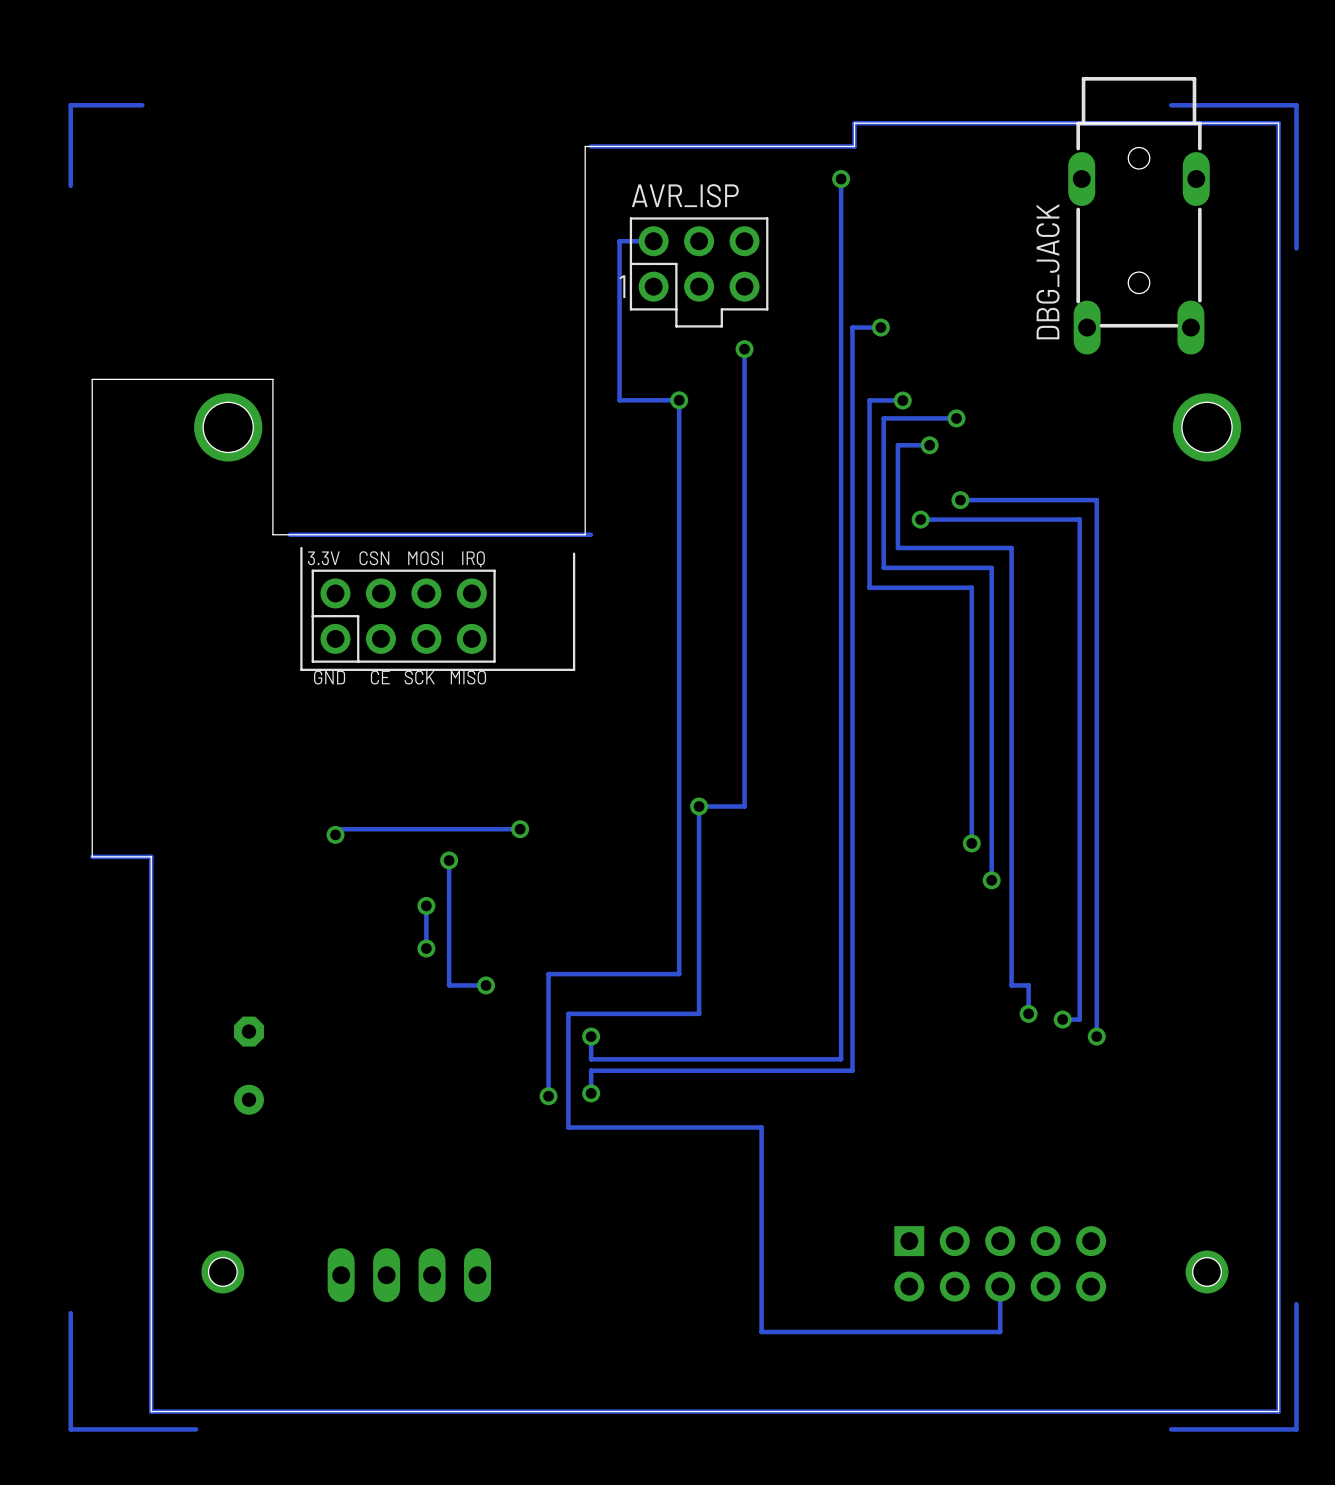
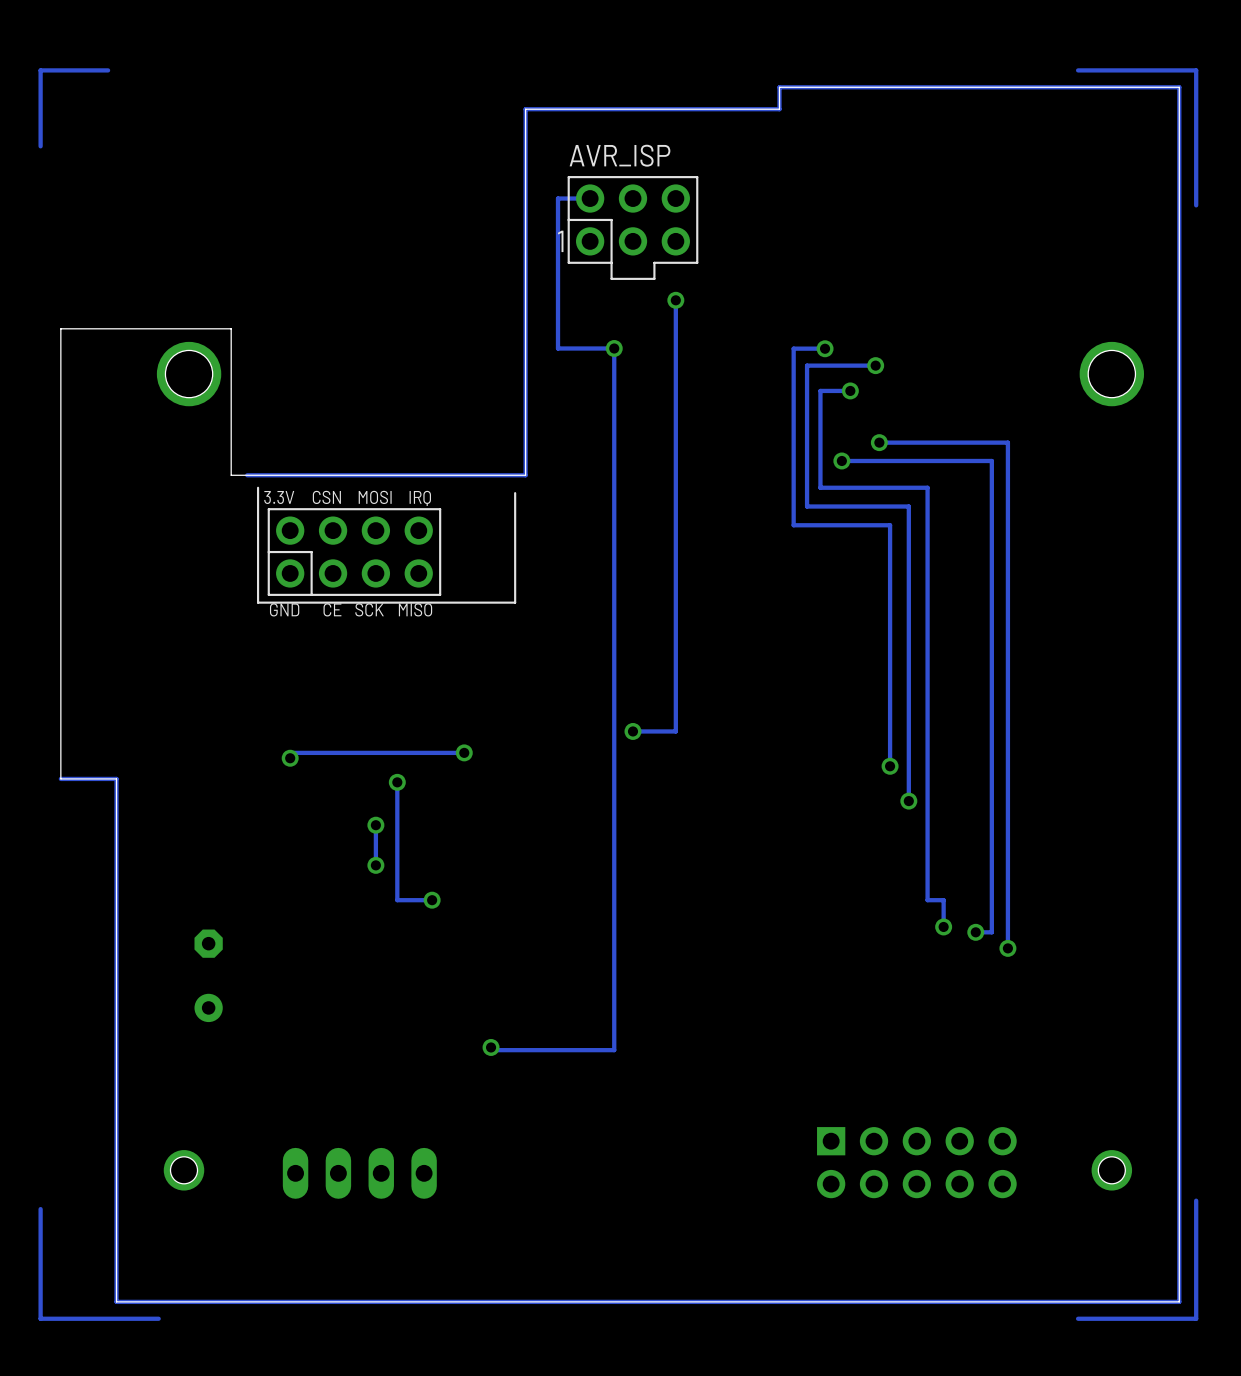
track: (841, 179) (841, 1059) (591, 1059) (591, 1036) -> none
via: (841, 179) -> none
DBG_JACK: (1139, 215) -> none
track: (880, 327) (852, 327) (852, 1070) (591, 1070) (591, 1093) -> none
via: (880, 327) -> none
track: (590, 534) (585, 534) -> (530, 109) (525, 109) (525, 475)
track: (699, 806) (699, 1013) (568, 1013) (568, 1127) (761, 1127) (761, 1332) (1000, 1332) (1000, 1286) -> none
track: (679, 974) (548, 974) (548, 1096) -> (614, 889) (614, 1050) (491, 1050) (491, 1047)
via: (591, 1036) -> none
via: (591, 1093) -> none
via: (548, 1096) -> none
via: none -> (491, 1047)

